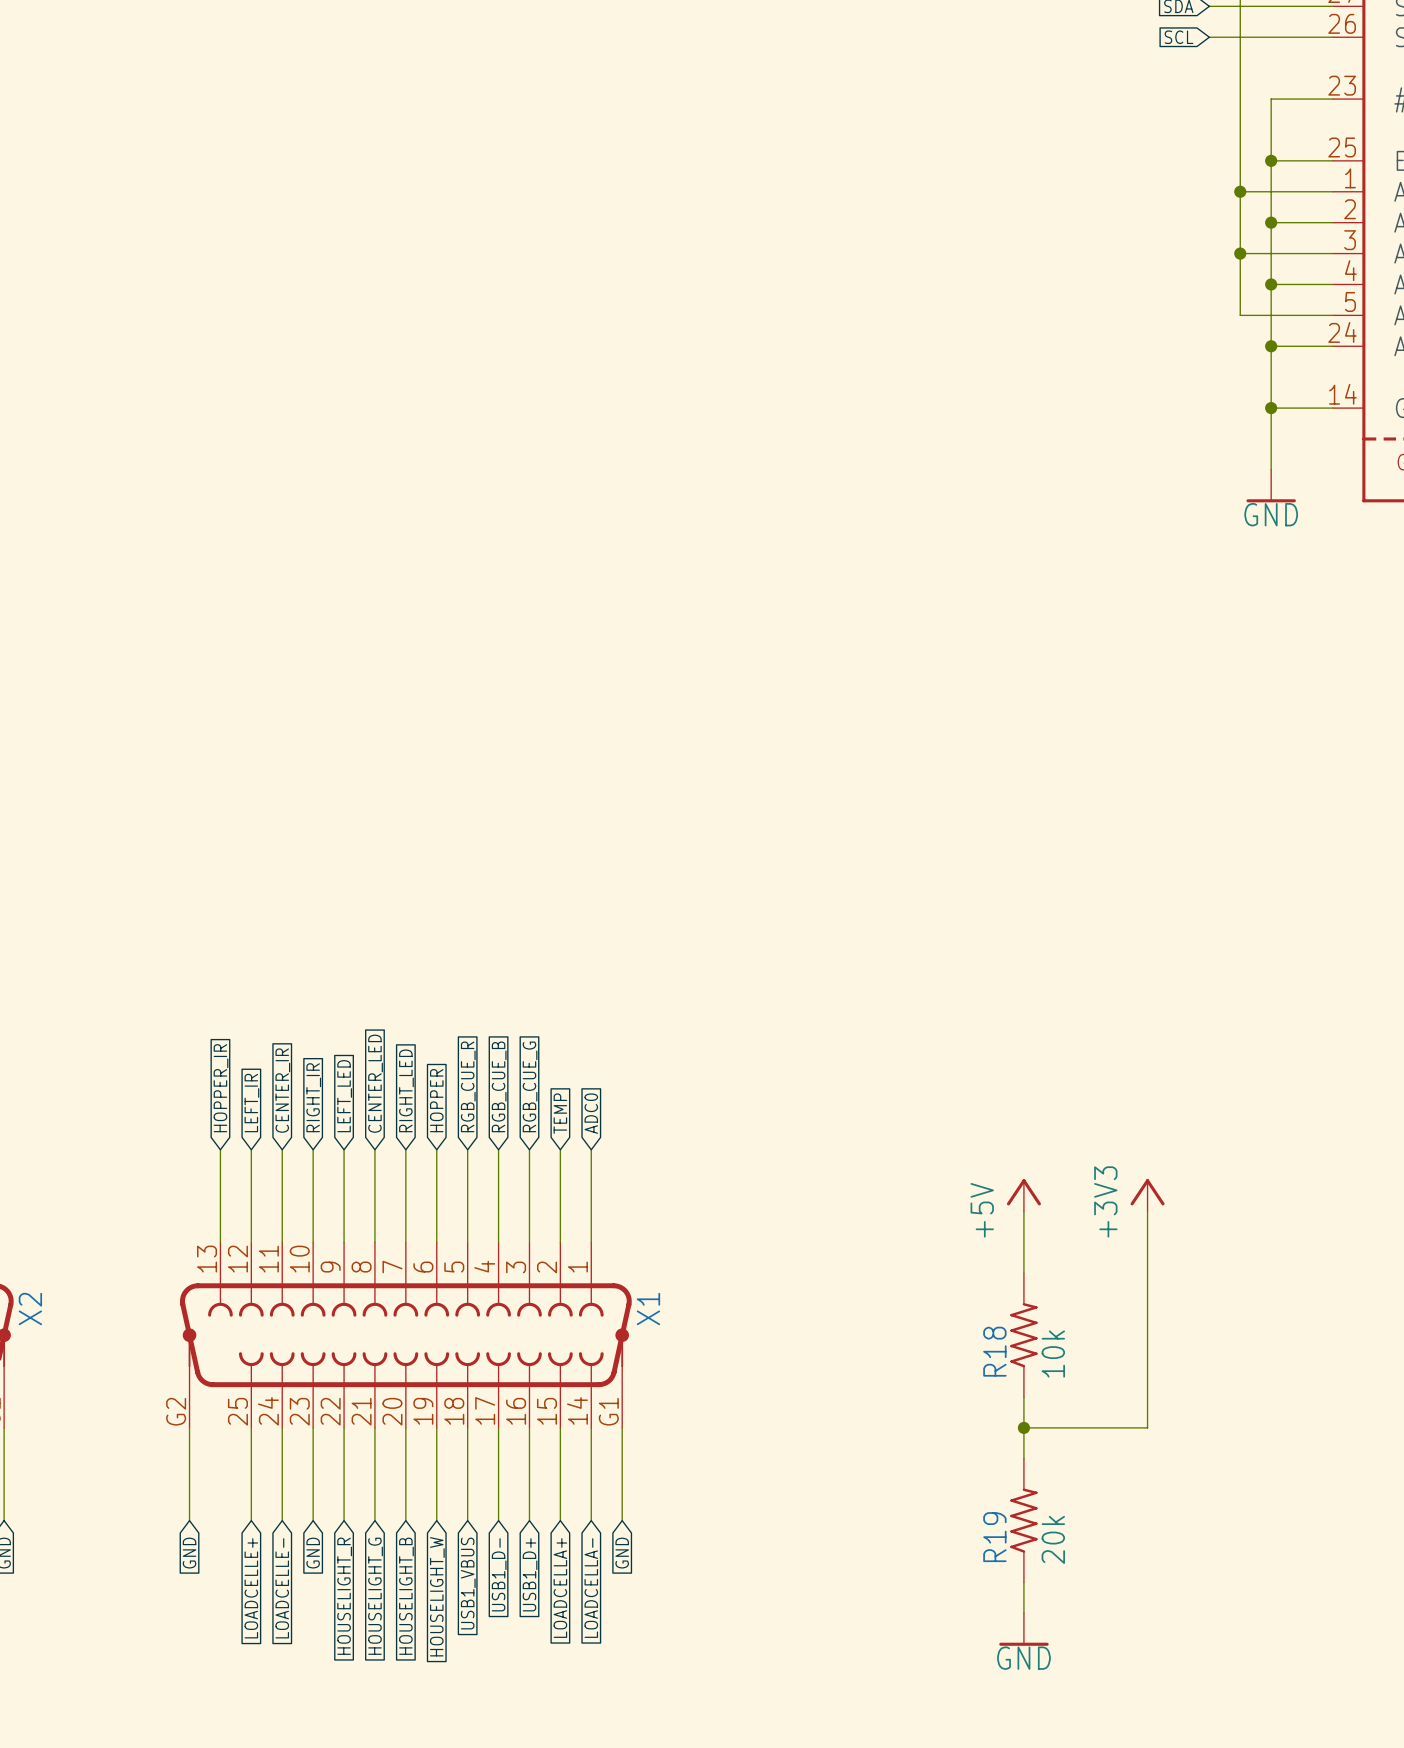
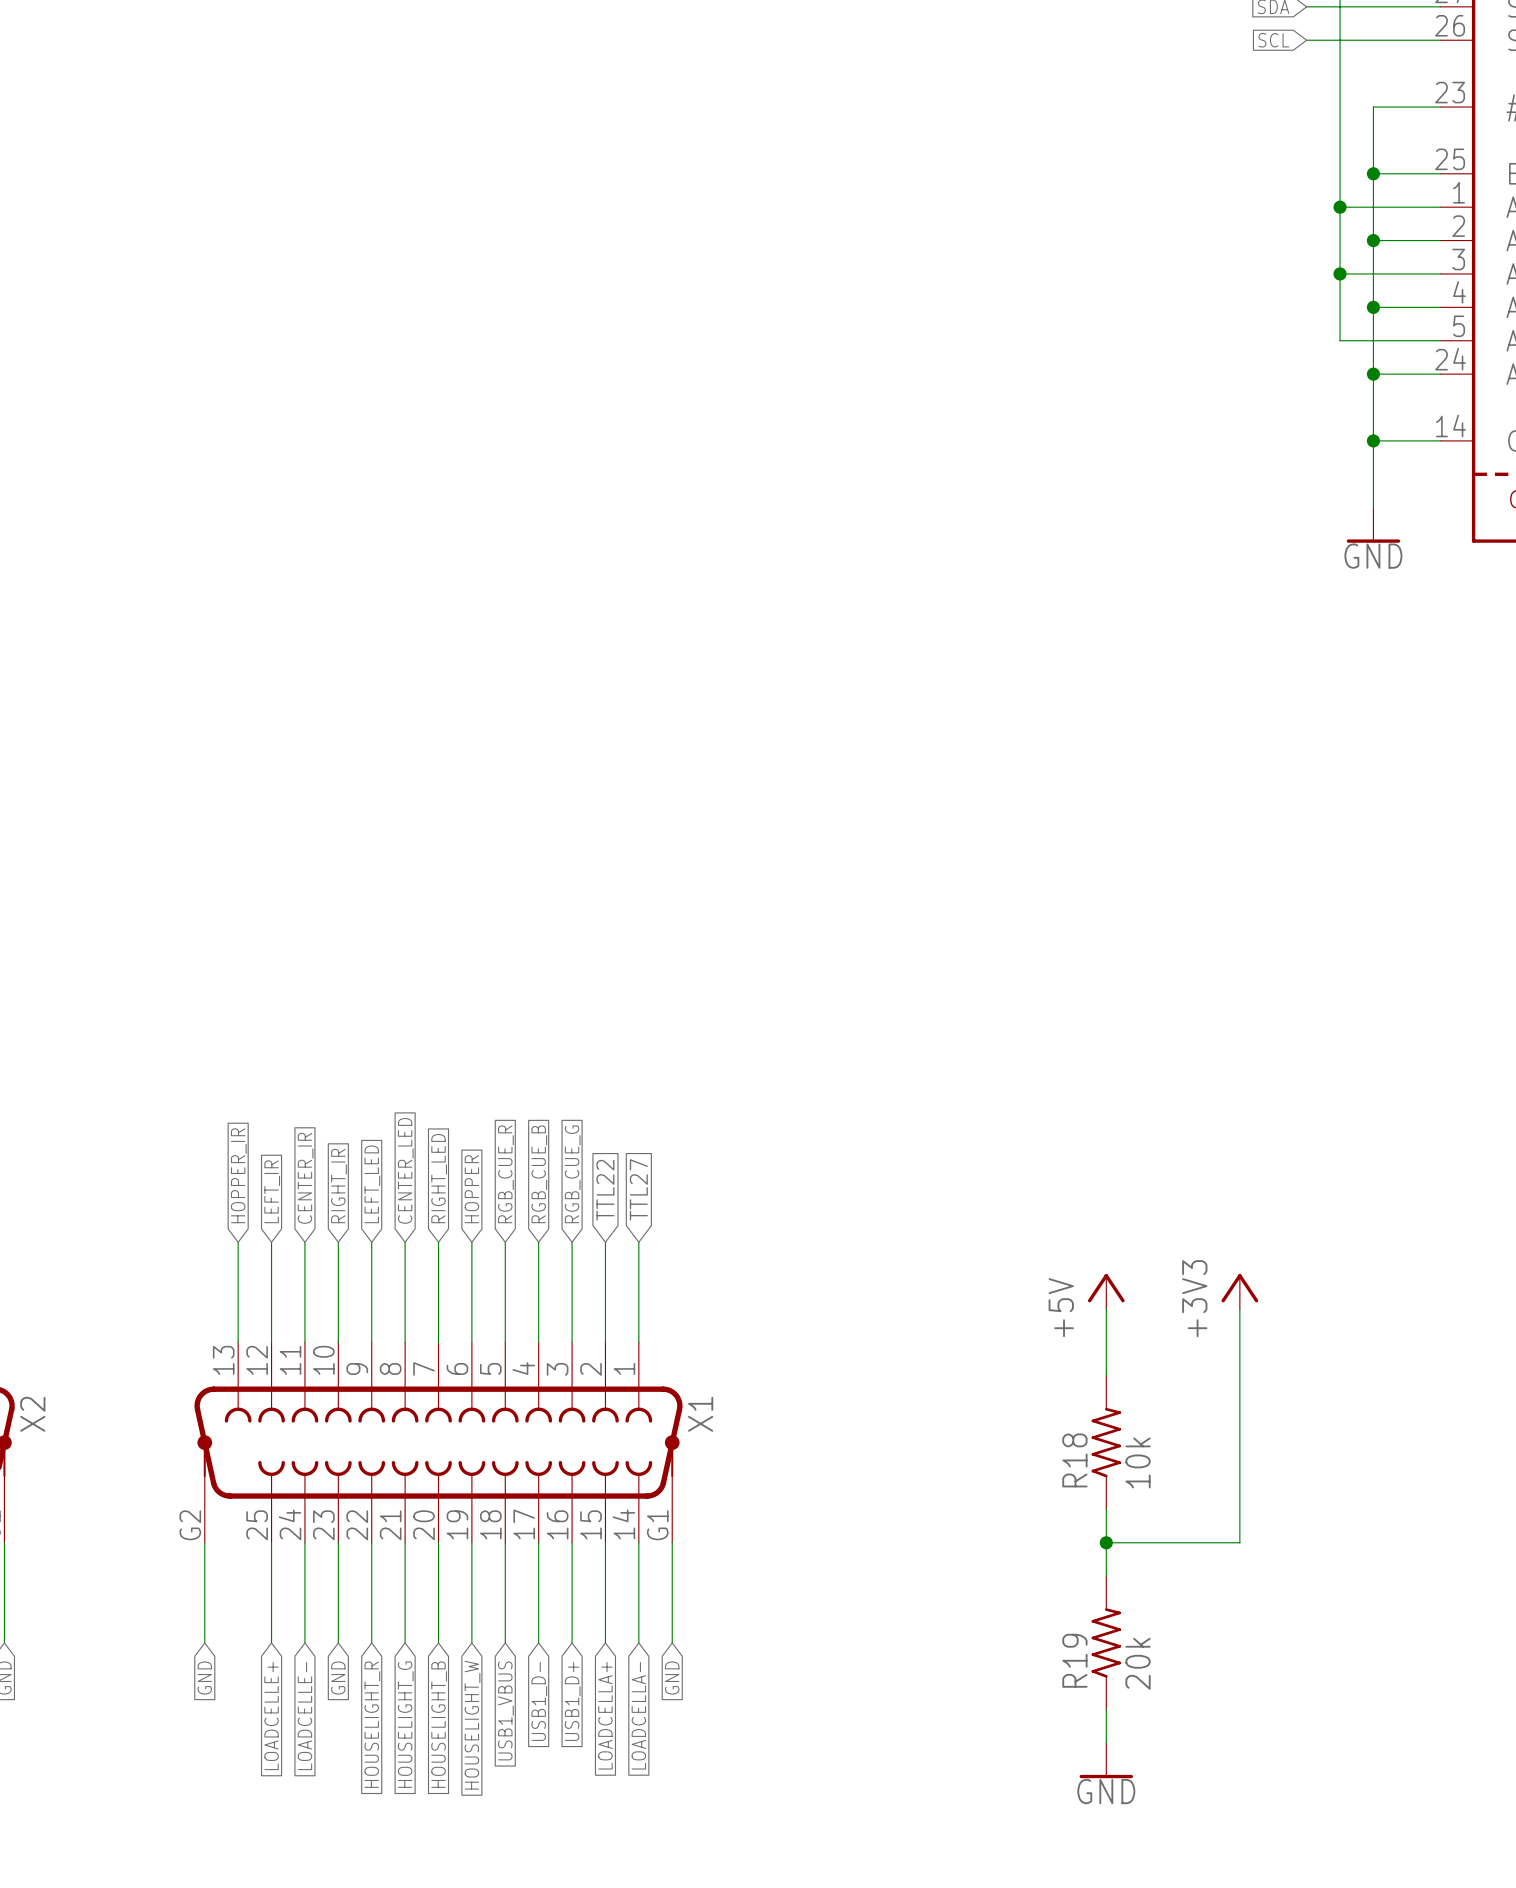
global label: TEMP (560, 1113) -> TTL22 (605, 1190)
global label: ADC0 (591, 1113) -> TTL27 (638, 1189)

